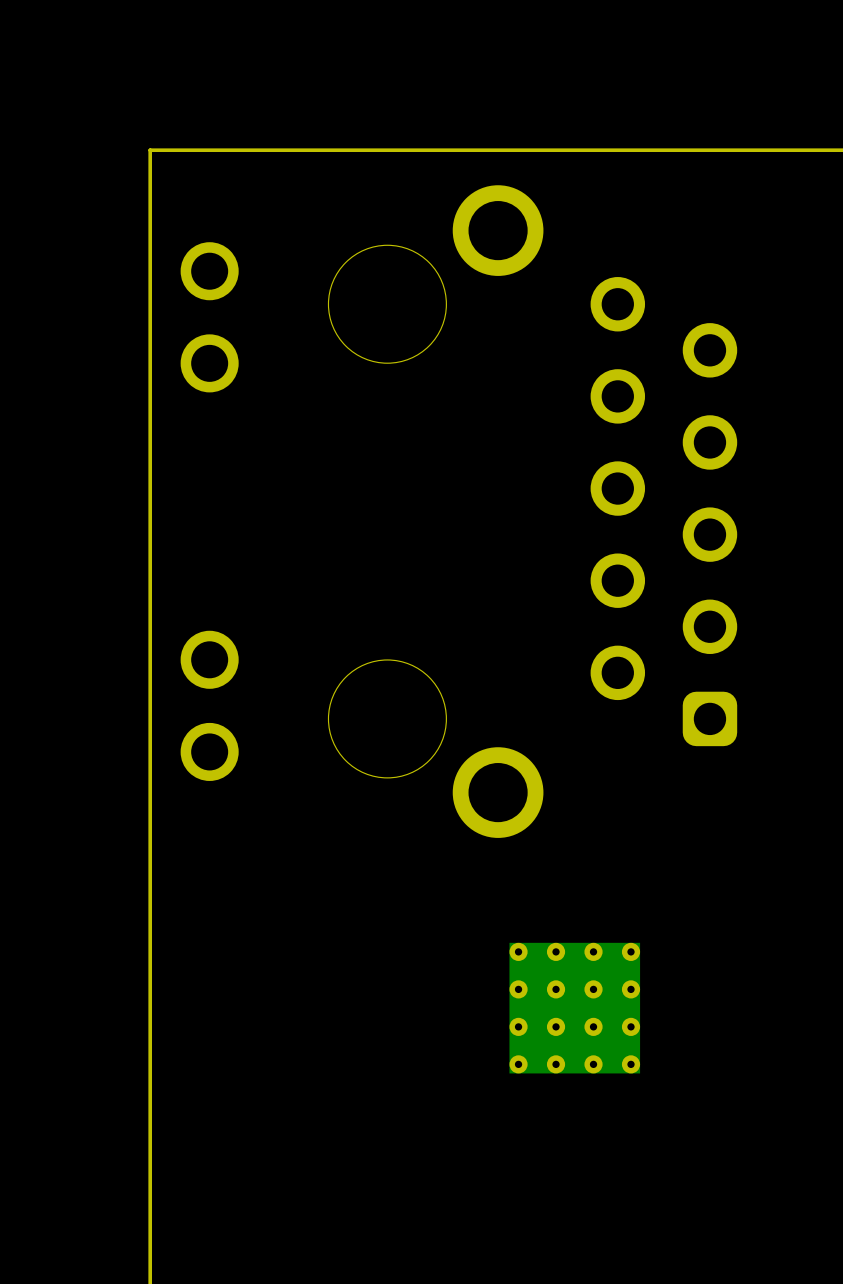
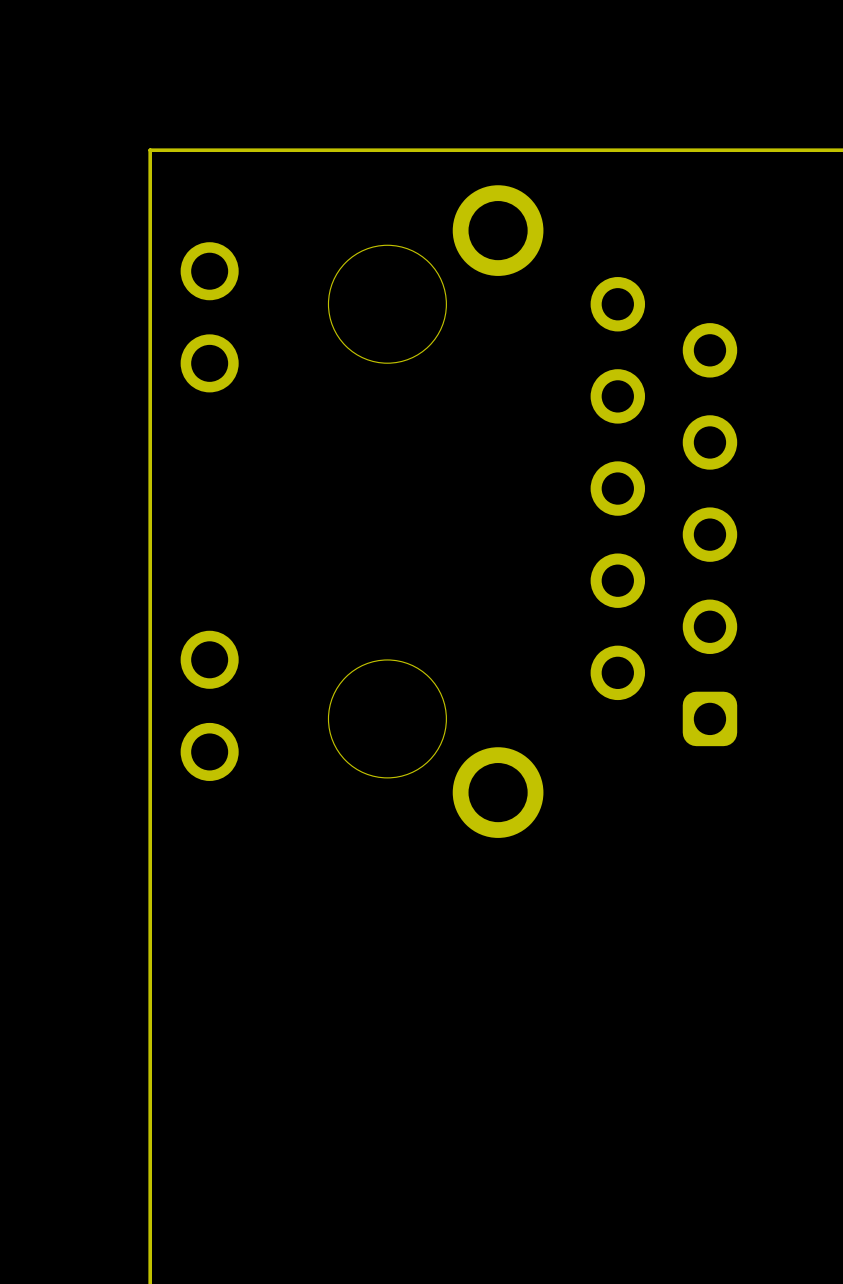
part: (574, 1008) -> none

